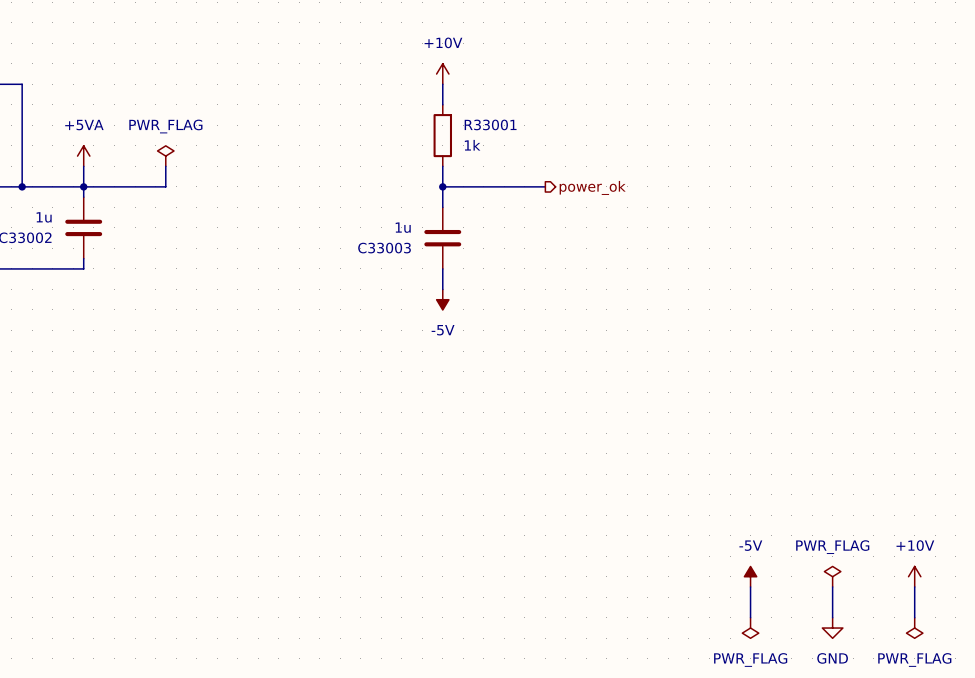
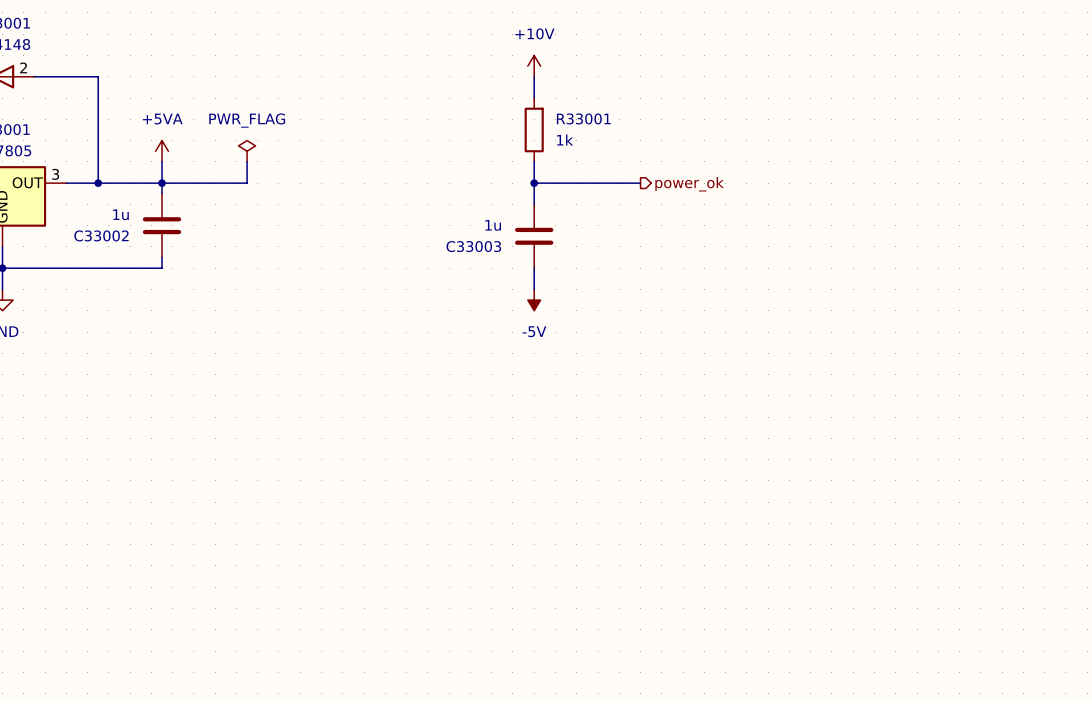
power symbol: -5V (750, 576) -> none
power symbol: PWR_FLAG (832, 576) -> none
power symbol: +10V (914, 576) -> none
wire: (750, 586) (750, 617) -> none
wire: (832, 586) (832, 617) -> none
wire: (914, 586) (914, 617) -> none
power symbol: PWR_FLAG (750, 628) -> none
power symbol: GND (832, 628) -> none
power symbol: PWR_FLAG (914, 628) -> none

